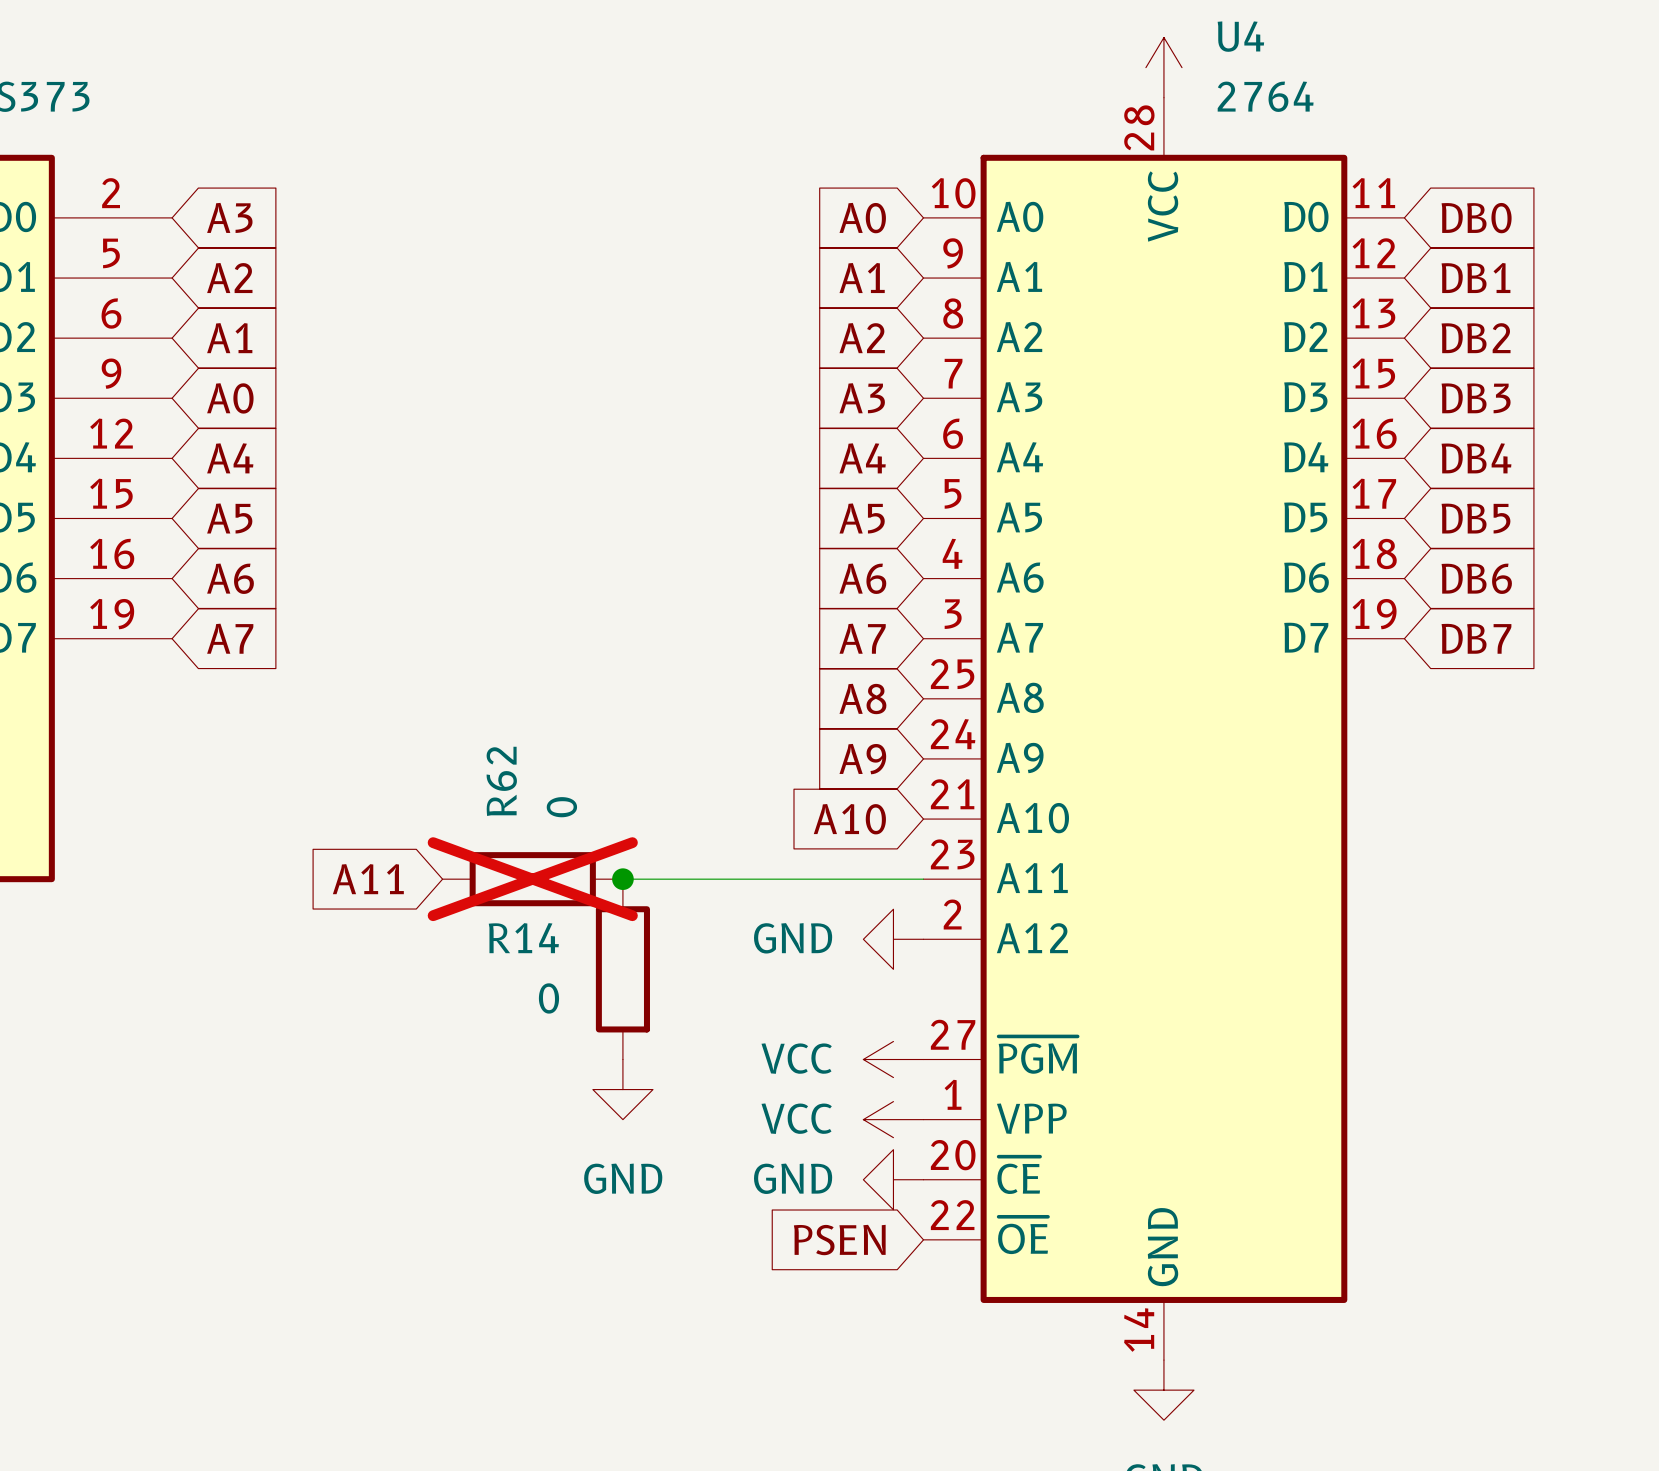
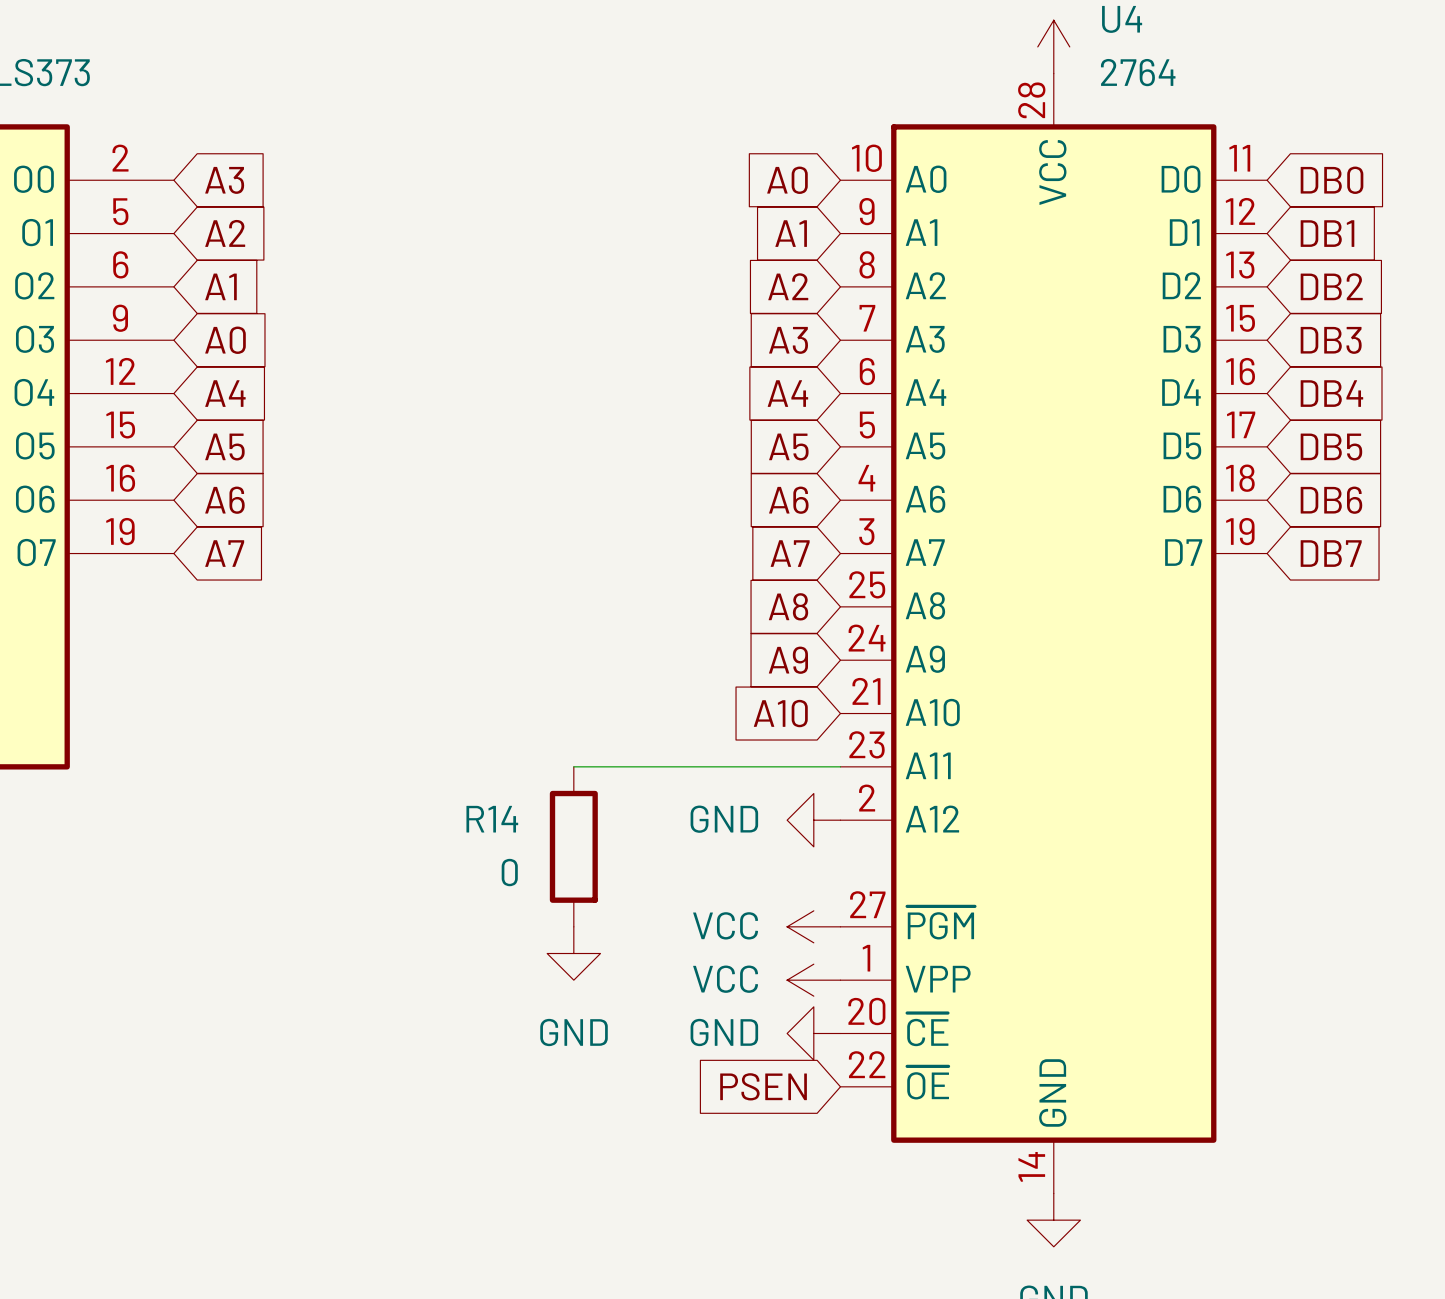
global label: A11 (368, 879) -> none
R62: 0 (532, 879) -> none
junction: (622, 879) -> none

